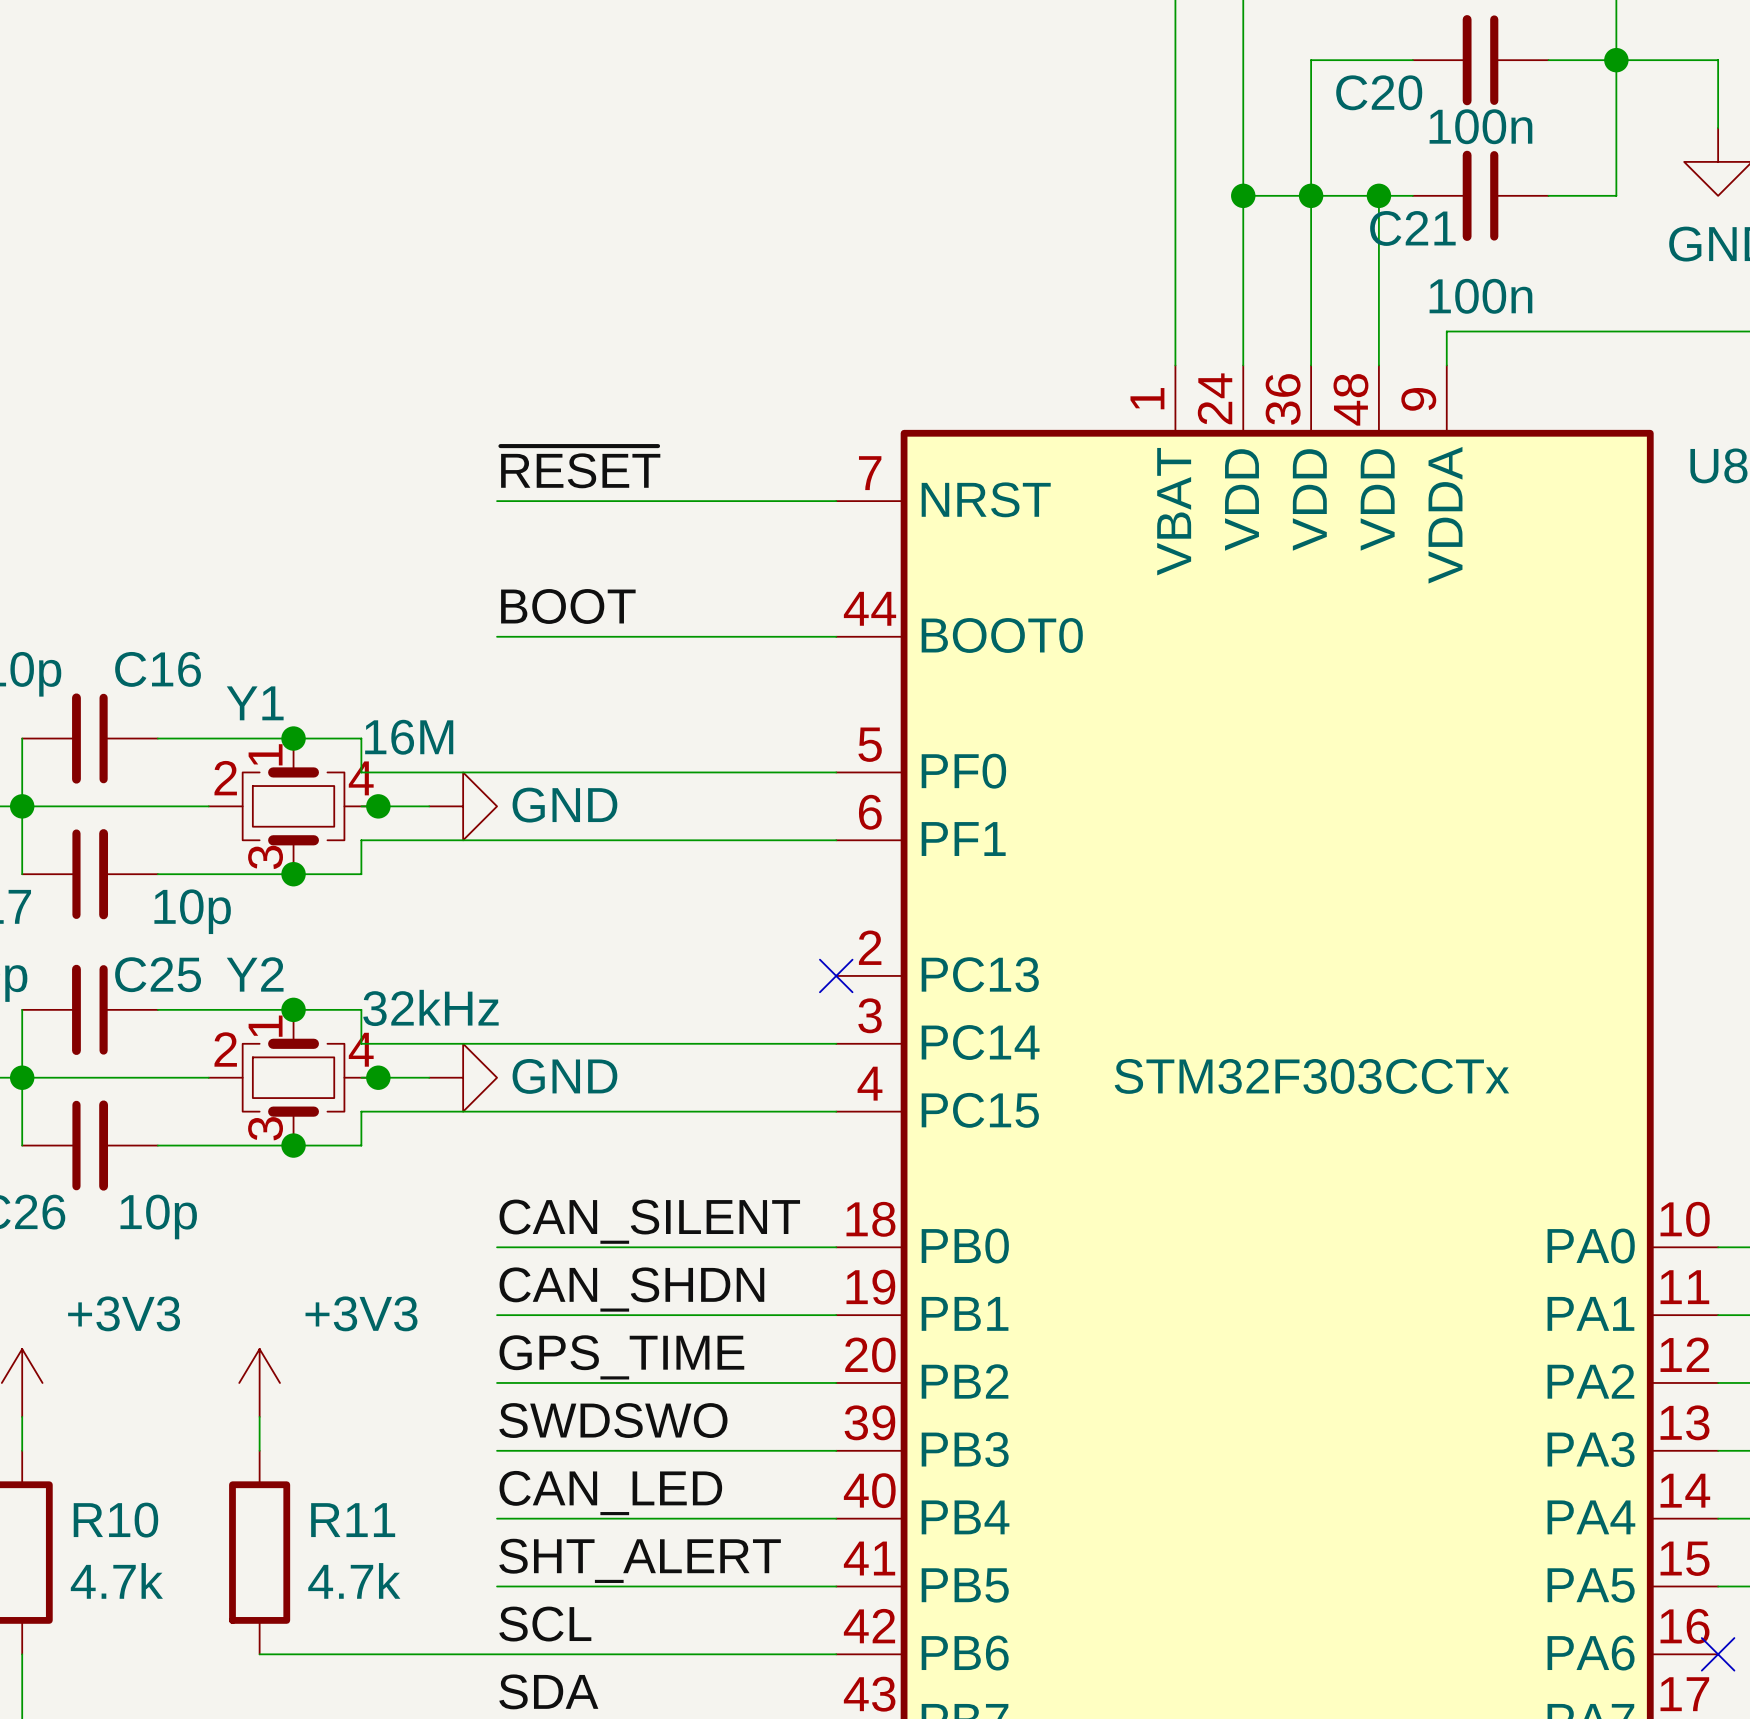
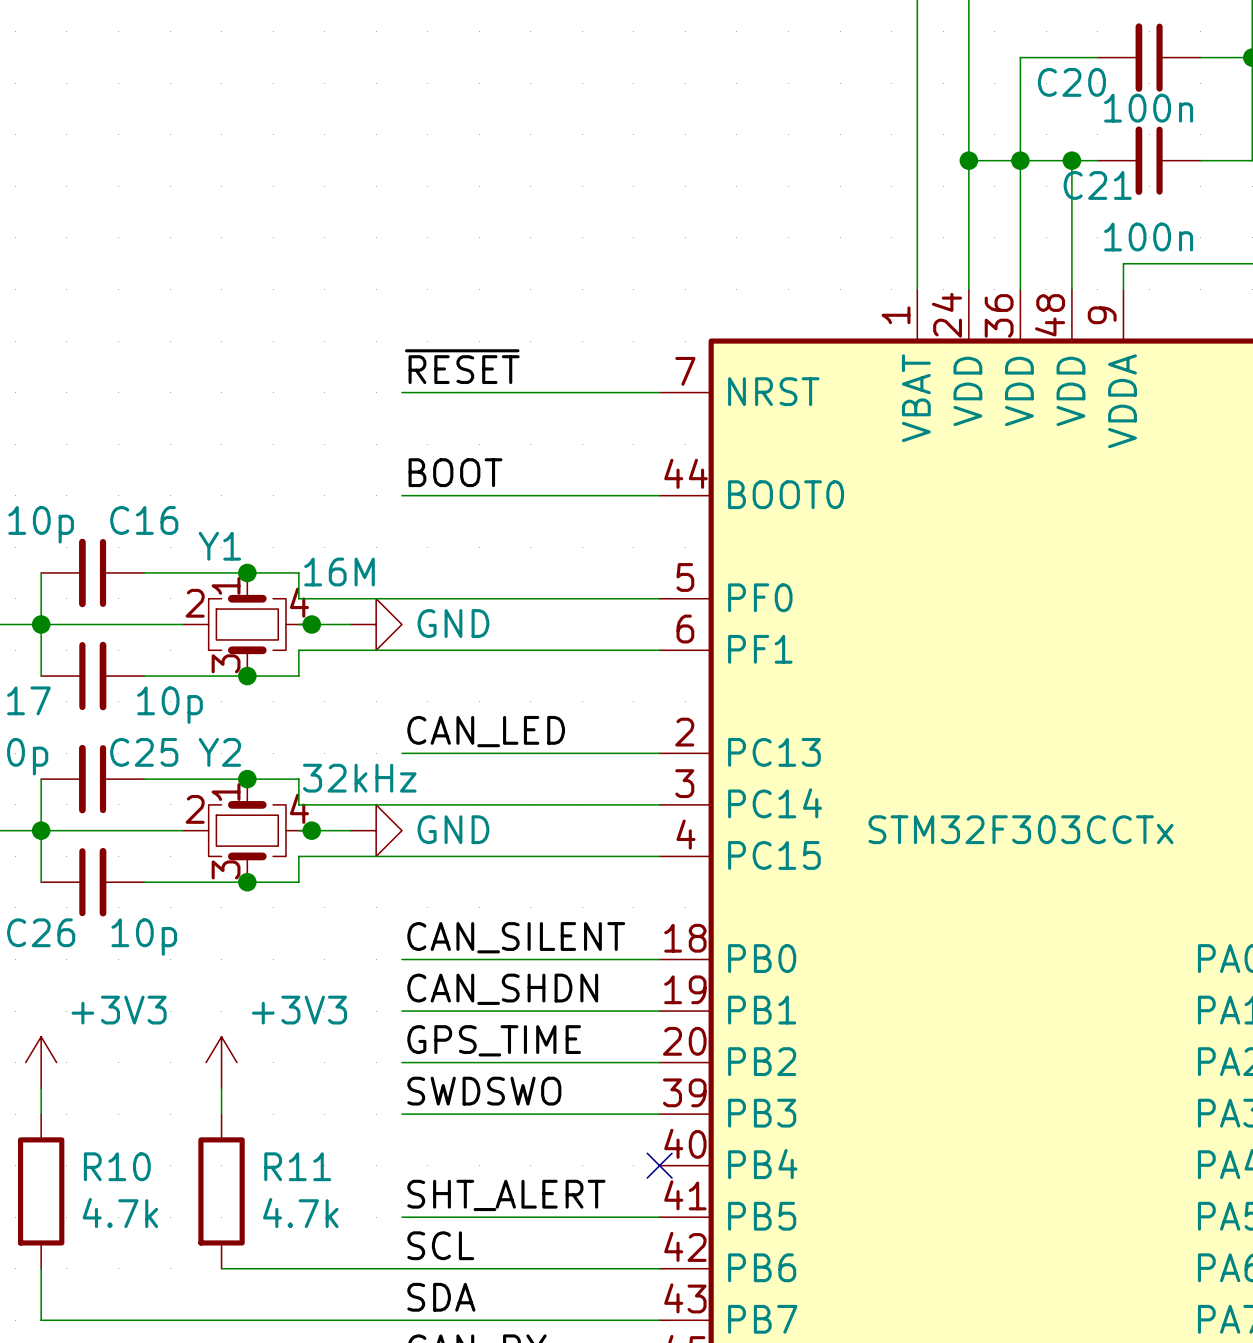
no-connect mark: (836, 975) -> none
label position: CAN_LED (610, 1493) -> CAN_LED (486, 731)
wire: (497, 1518) (836, 1518) -> (401, 753) (659, 753)
no-connect mark: none -> (659, 1165)

